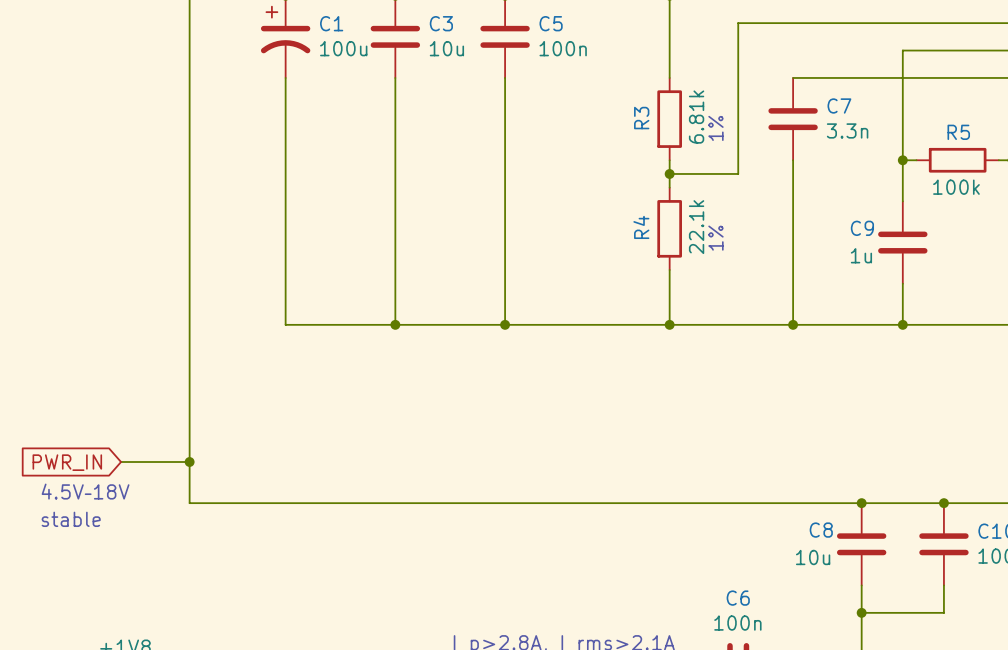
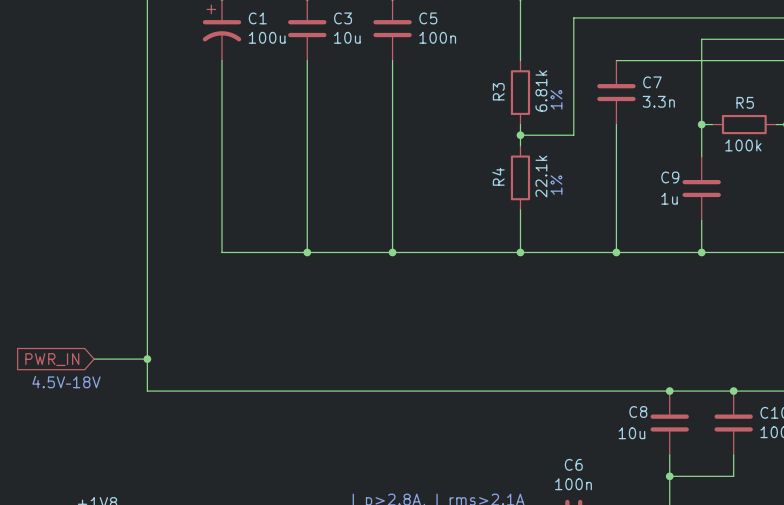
text: stable (71, 519) -> none

